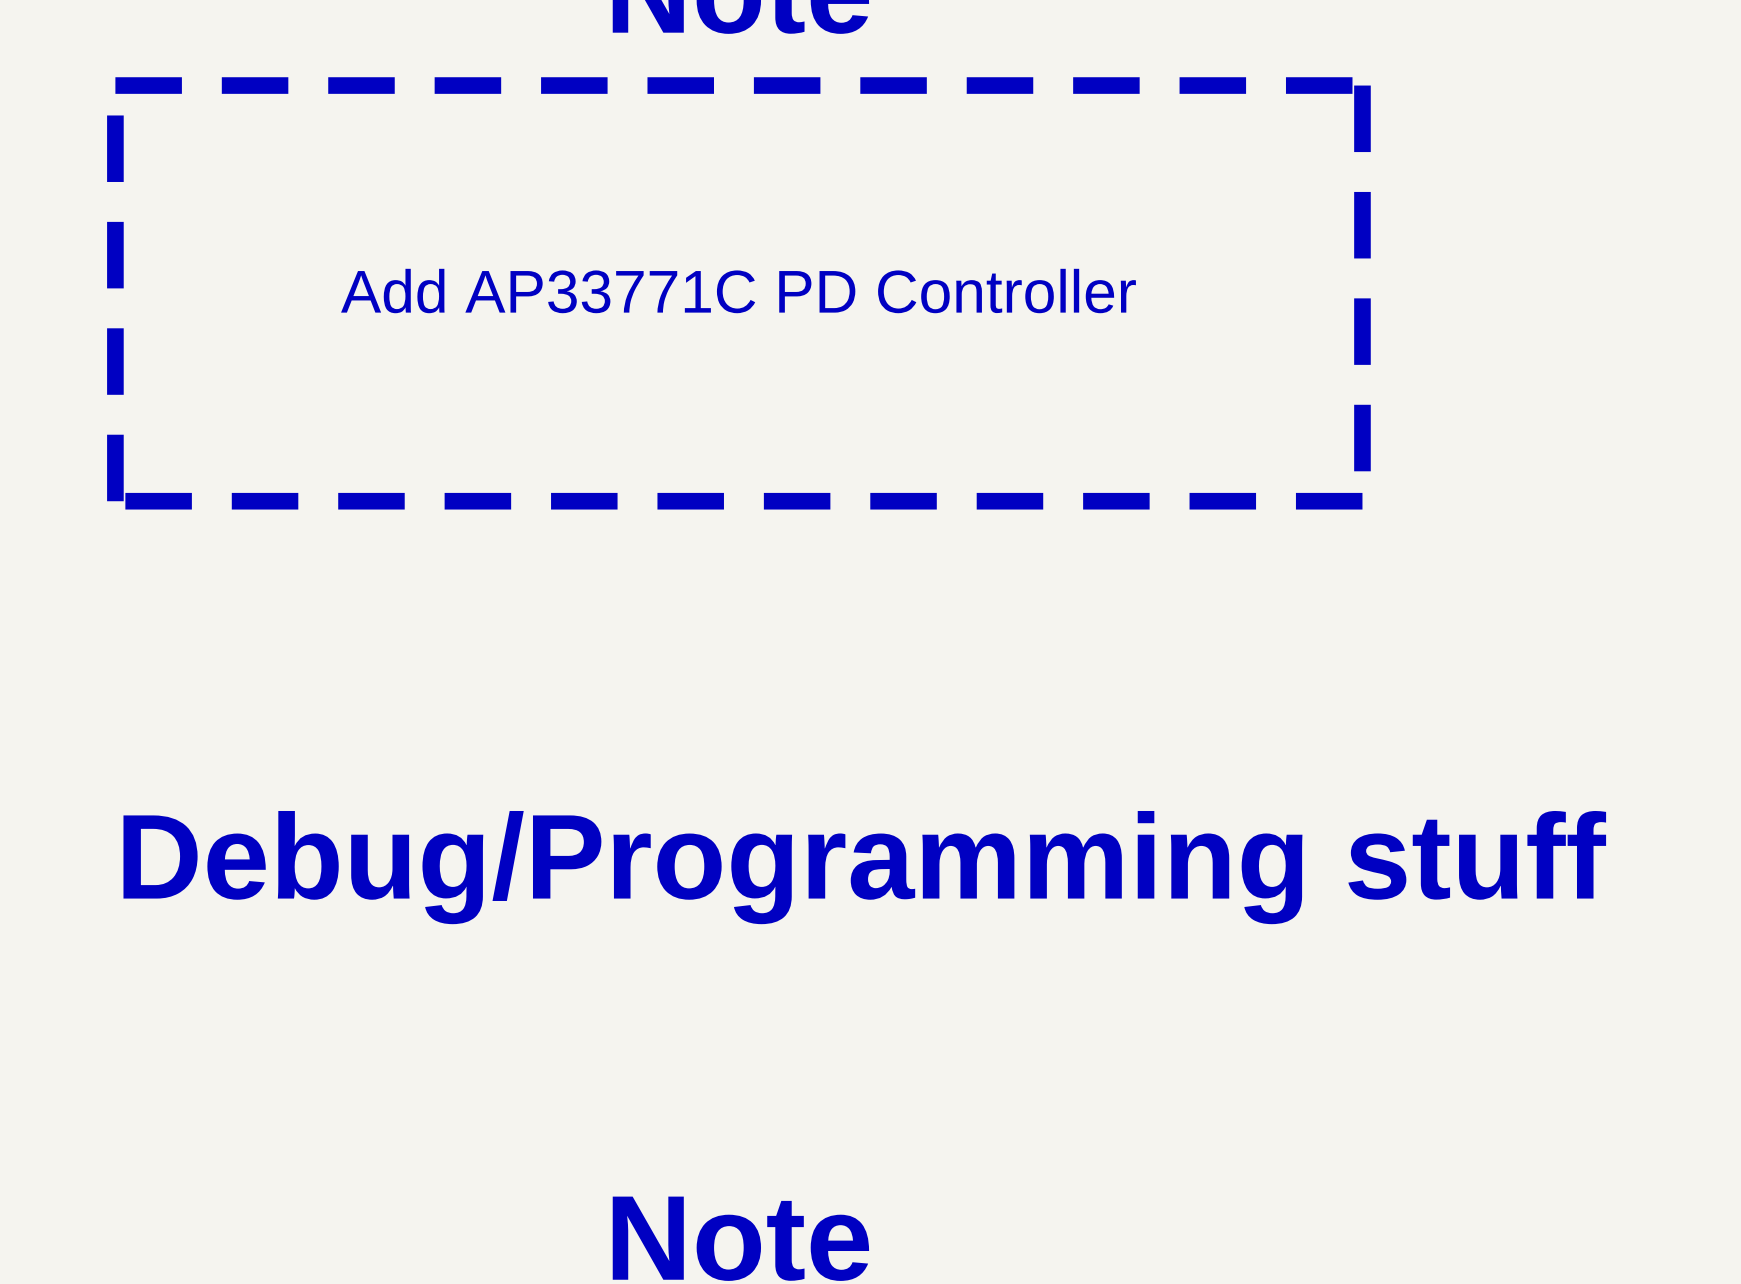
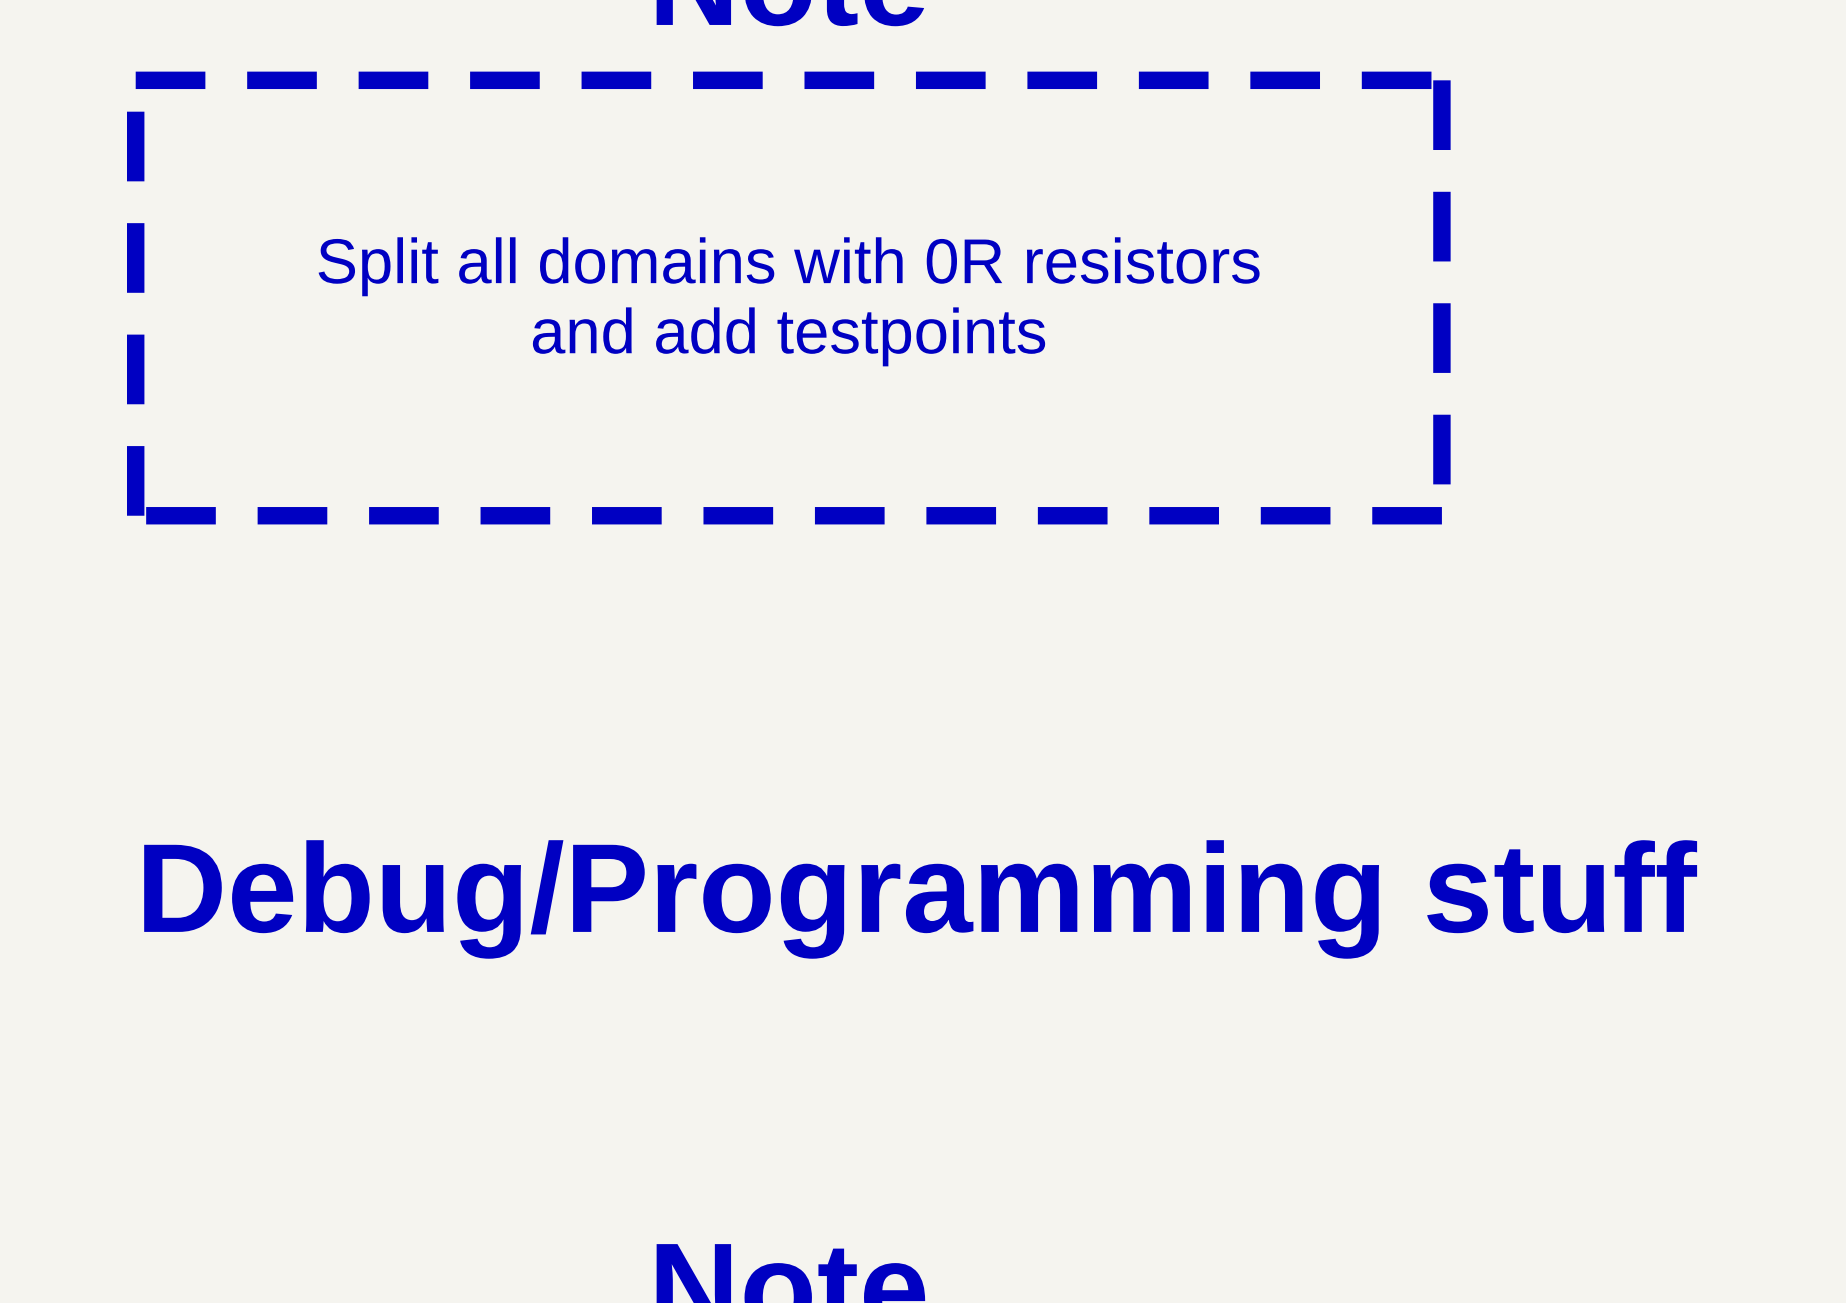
text: none -> Split all domains with 0R resistors (789, 266)
text: Add AP33771C PD Controller (738, 291) -> none
text: none -> and add testpoints (789, 336)

